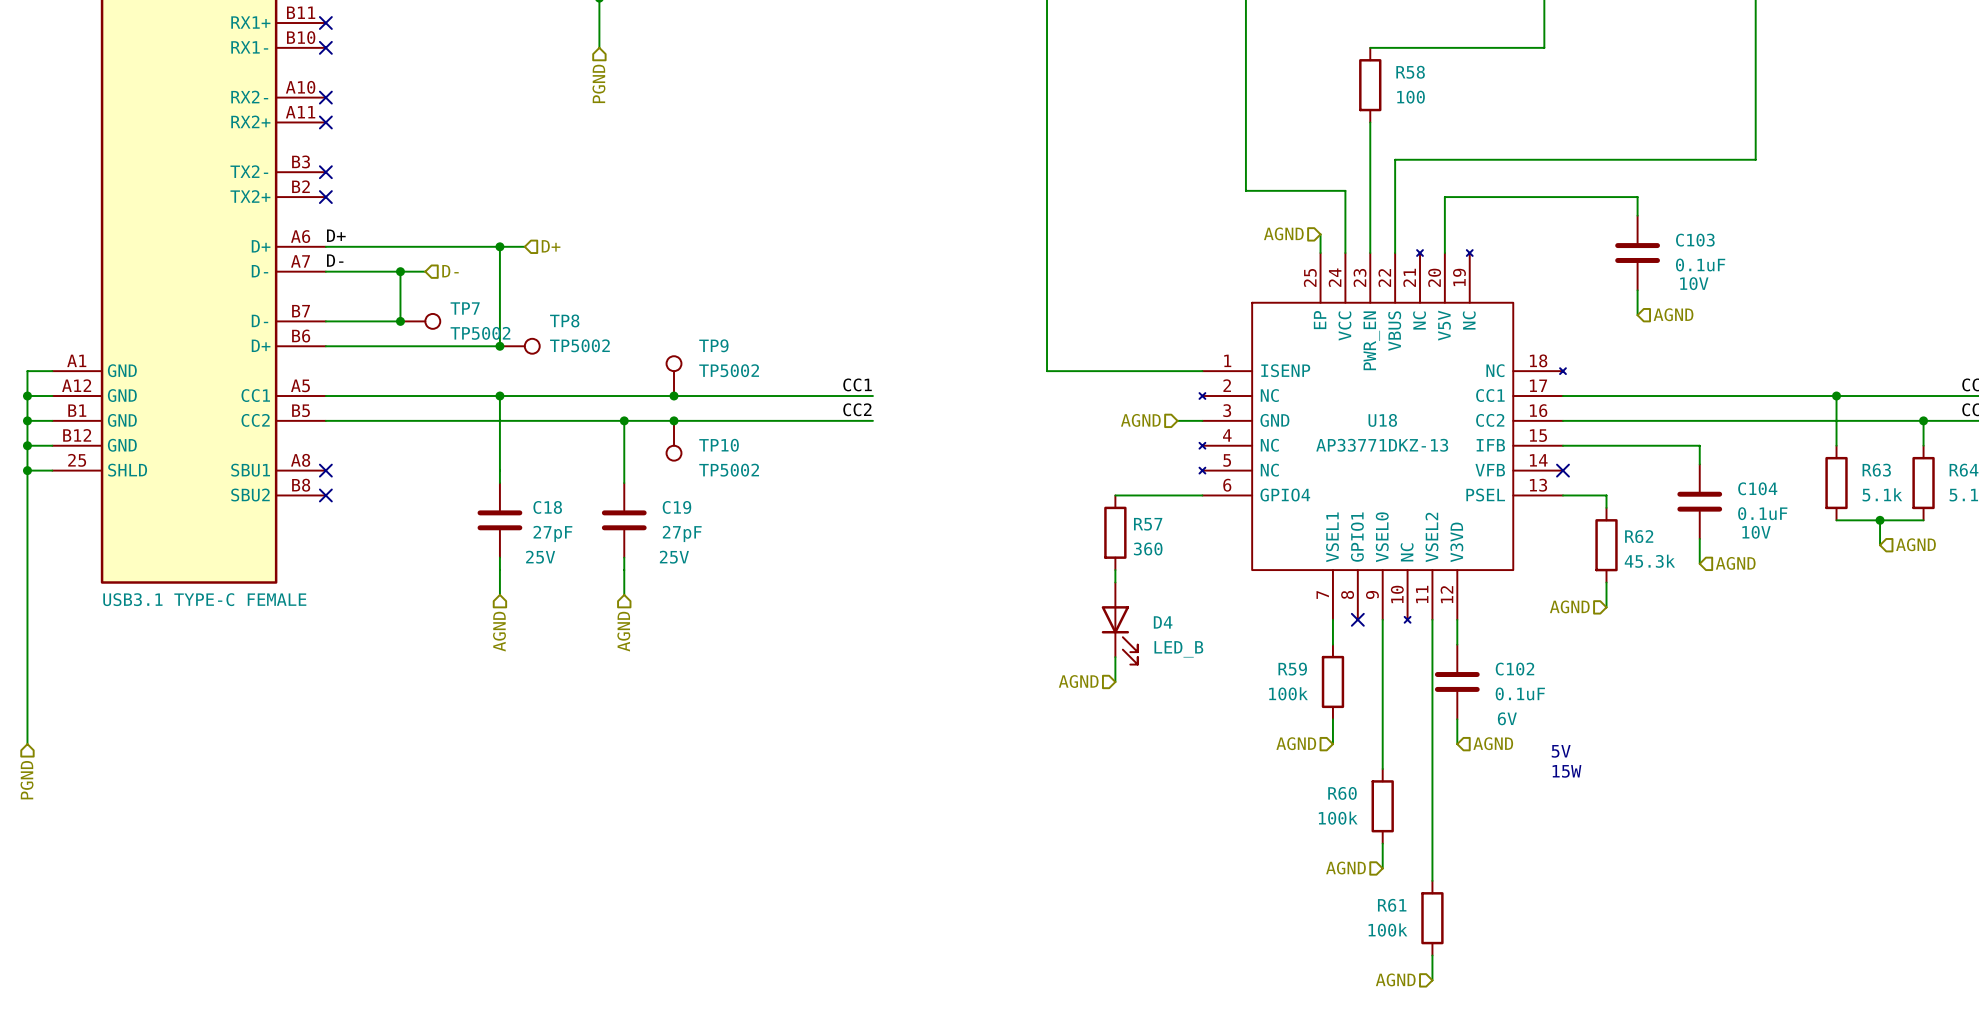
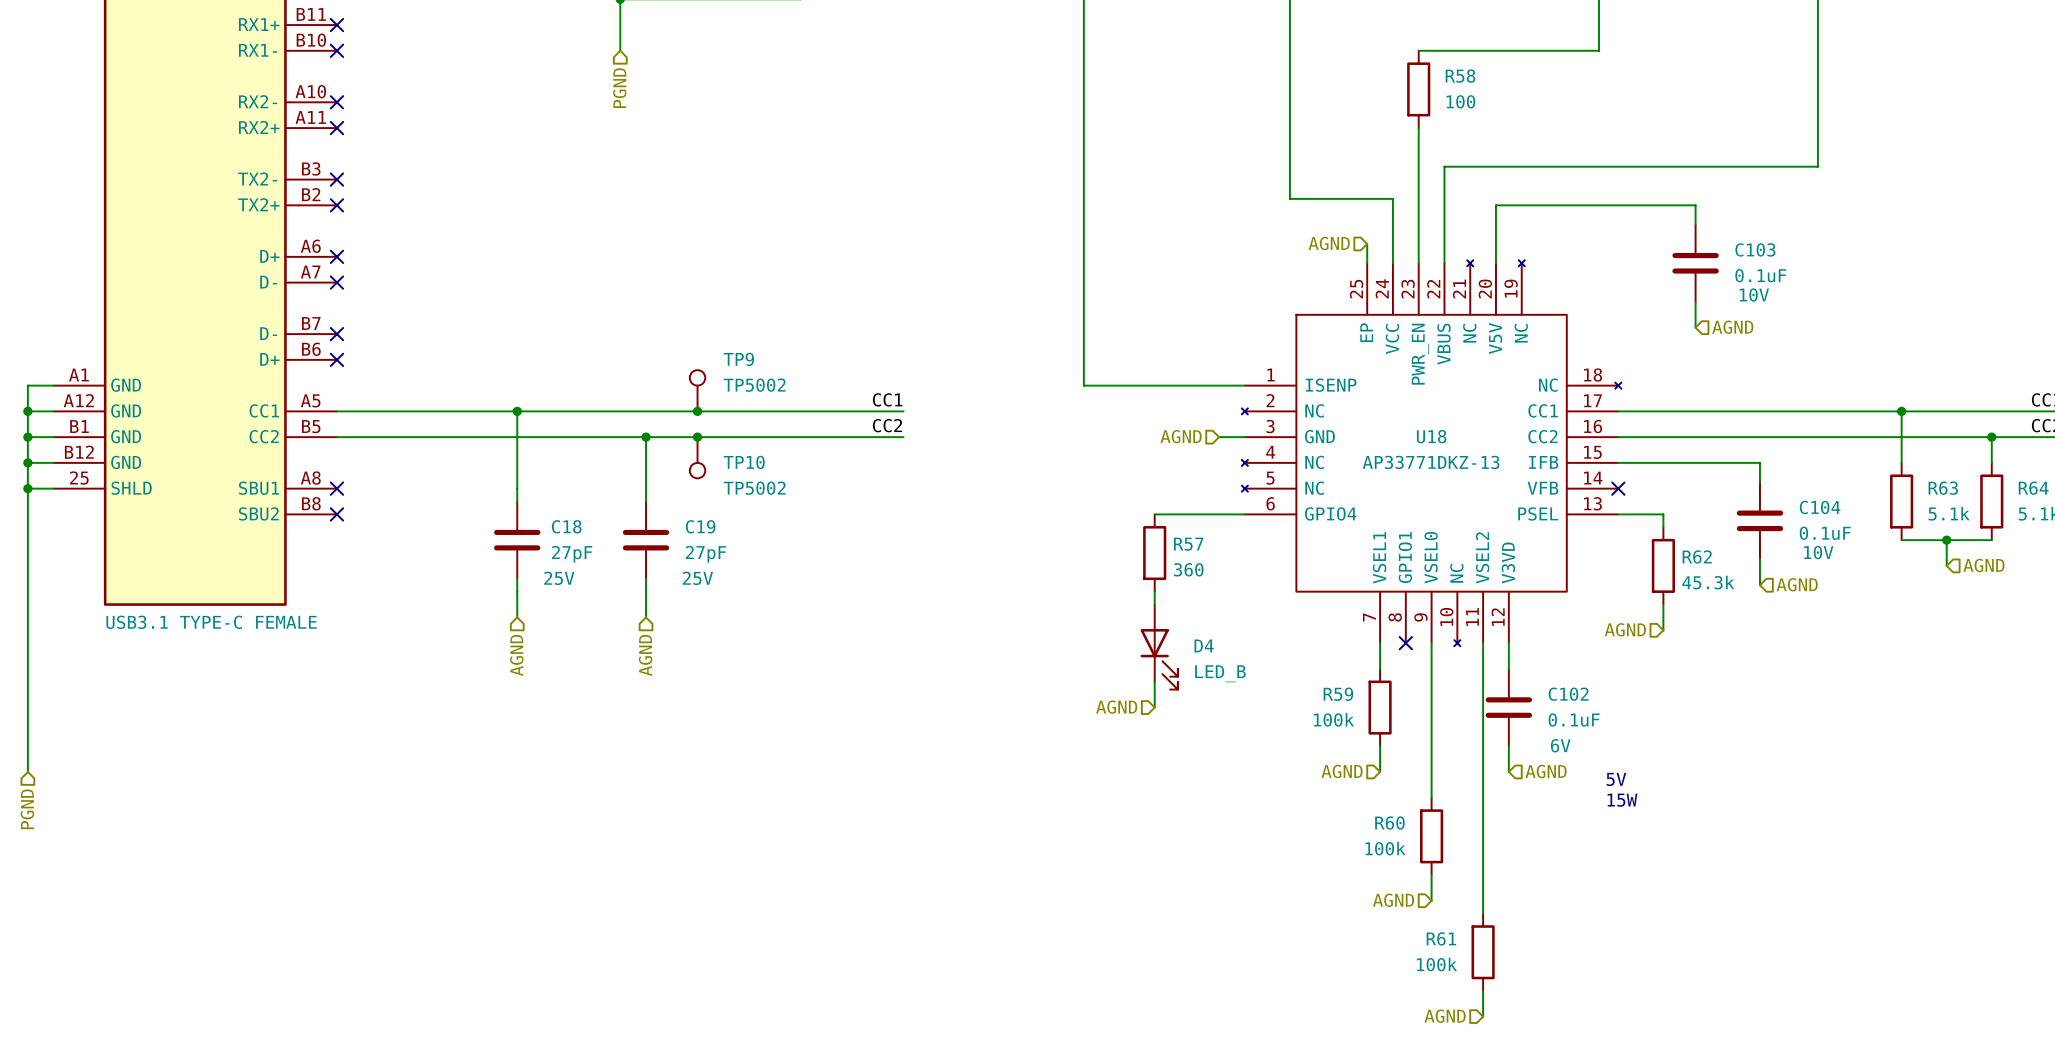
label: D+ (336, 235) -> none
wire: (325, 246) (524, 246) -> none
no-connect mark: none -> (336, 256)
wire: (499, 246) (499, 346) (325, 346) -> none
junction: (499, 246) -> none
hierarchical label: D+ (551, 246) -> none
label: D- (335, 260) -> none
wire: (325, 271) (425, 271) -> none
no-connect mark: none -> (336, 282)
wire: (400, 271) (400, 321) (325, 321) -> none
junction: (400, 271) -> none
hierarchical label: D- (450, 271) -> none
no-connect mark: none -> (336, 334)
junction: (400, 321) -> none
TP7: TP5002 (420, 321) -> none
no-connect mark: none -> (336, 359)
junction: (499, 346) -> none
TP8: TP5002 (519, 346) -> none

